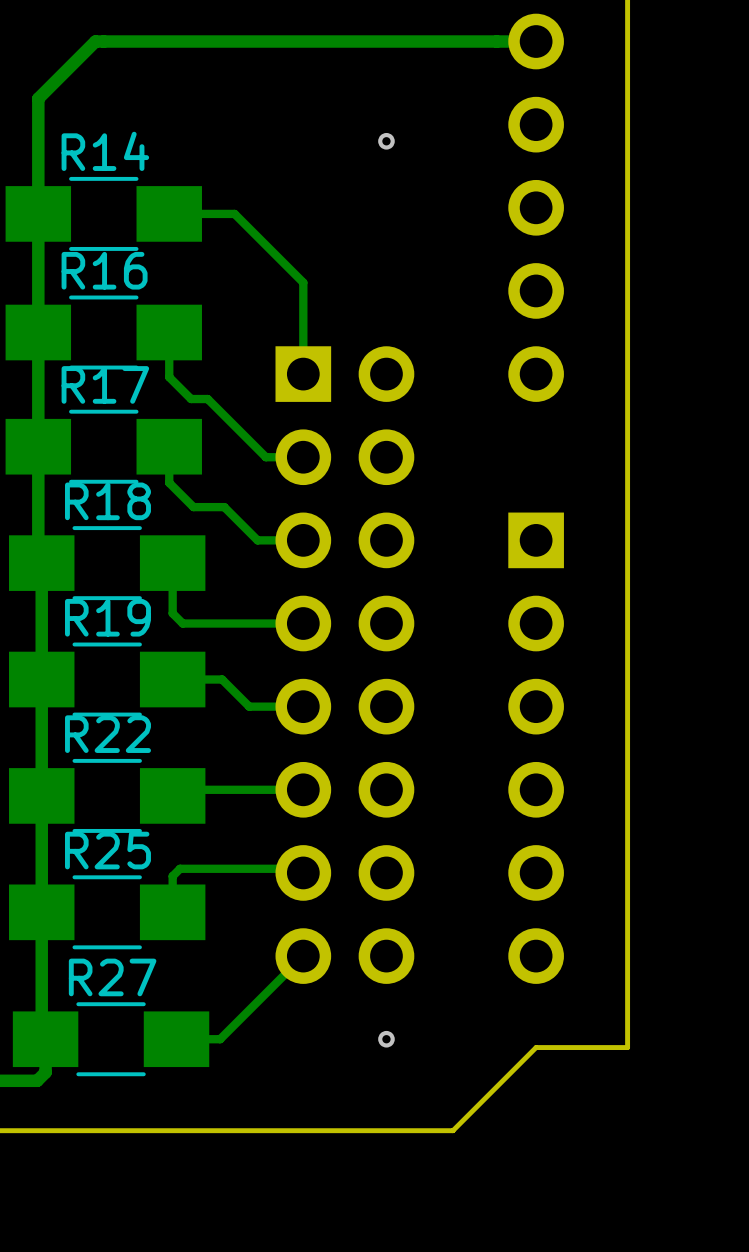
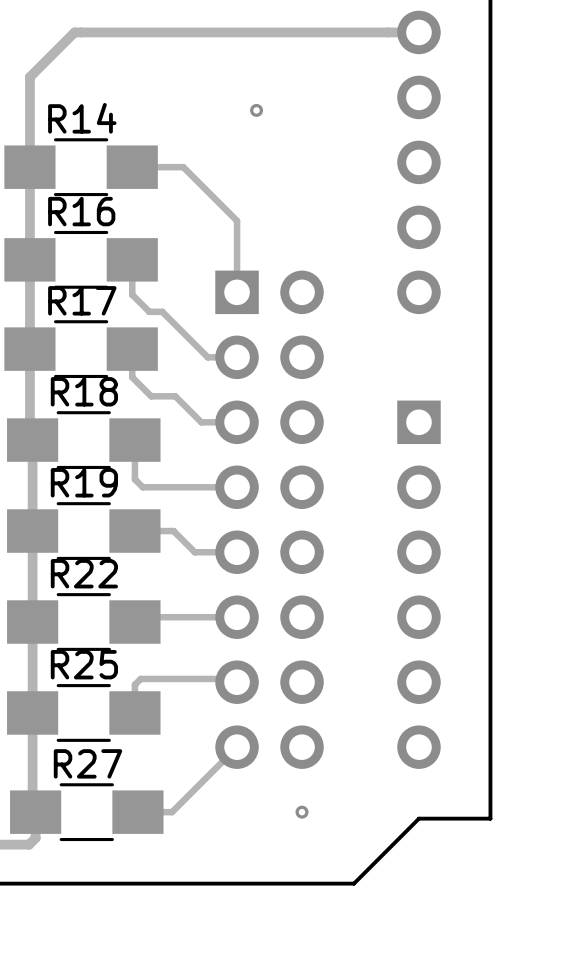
via position: (386, 141) -> (256, 110)

